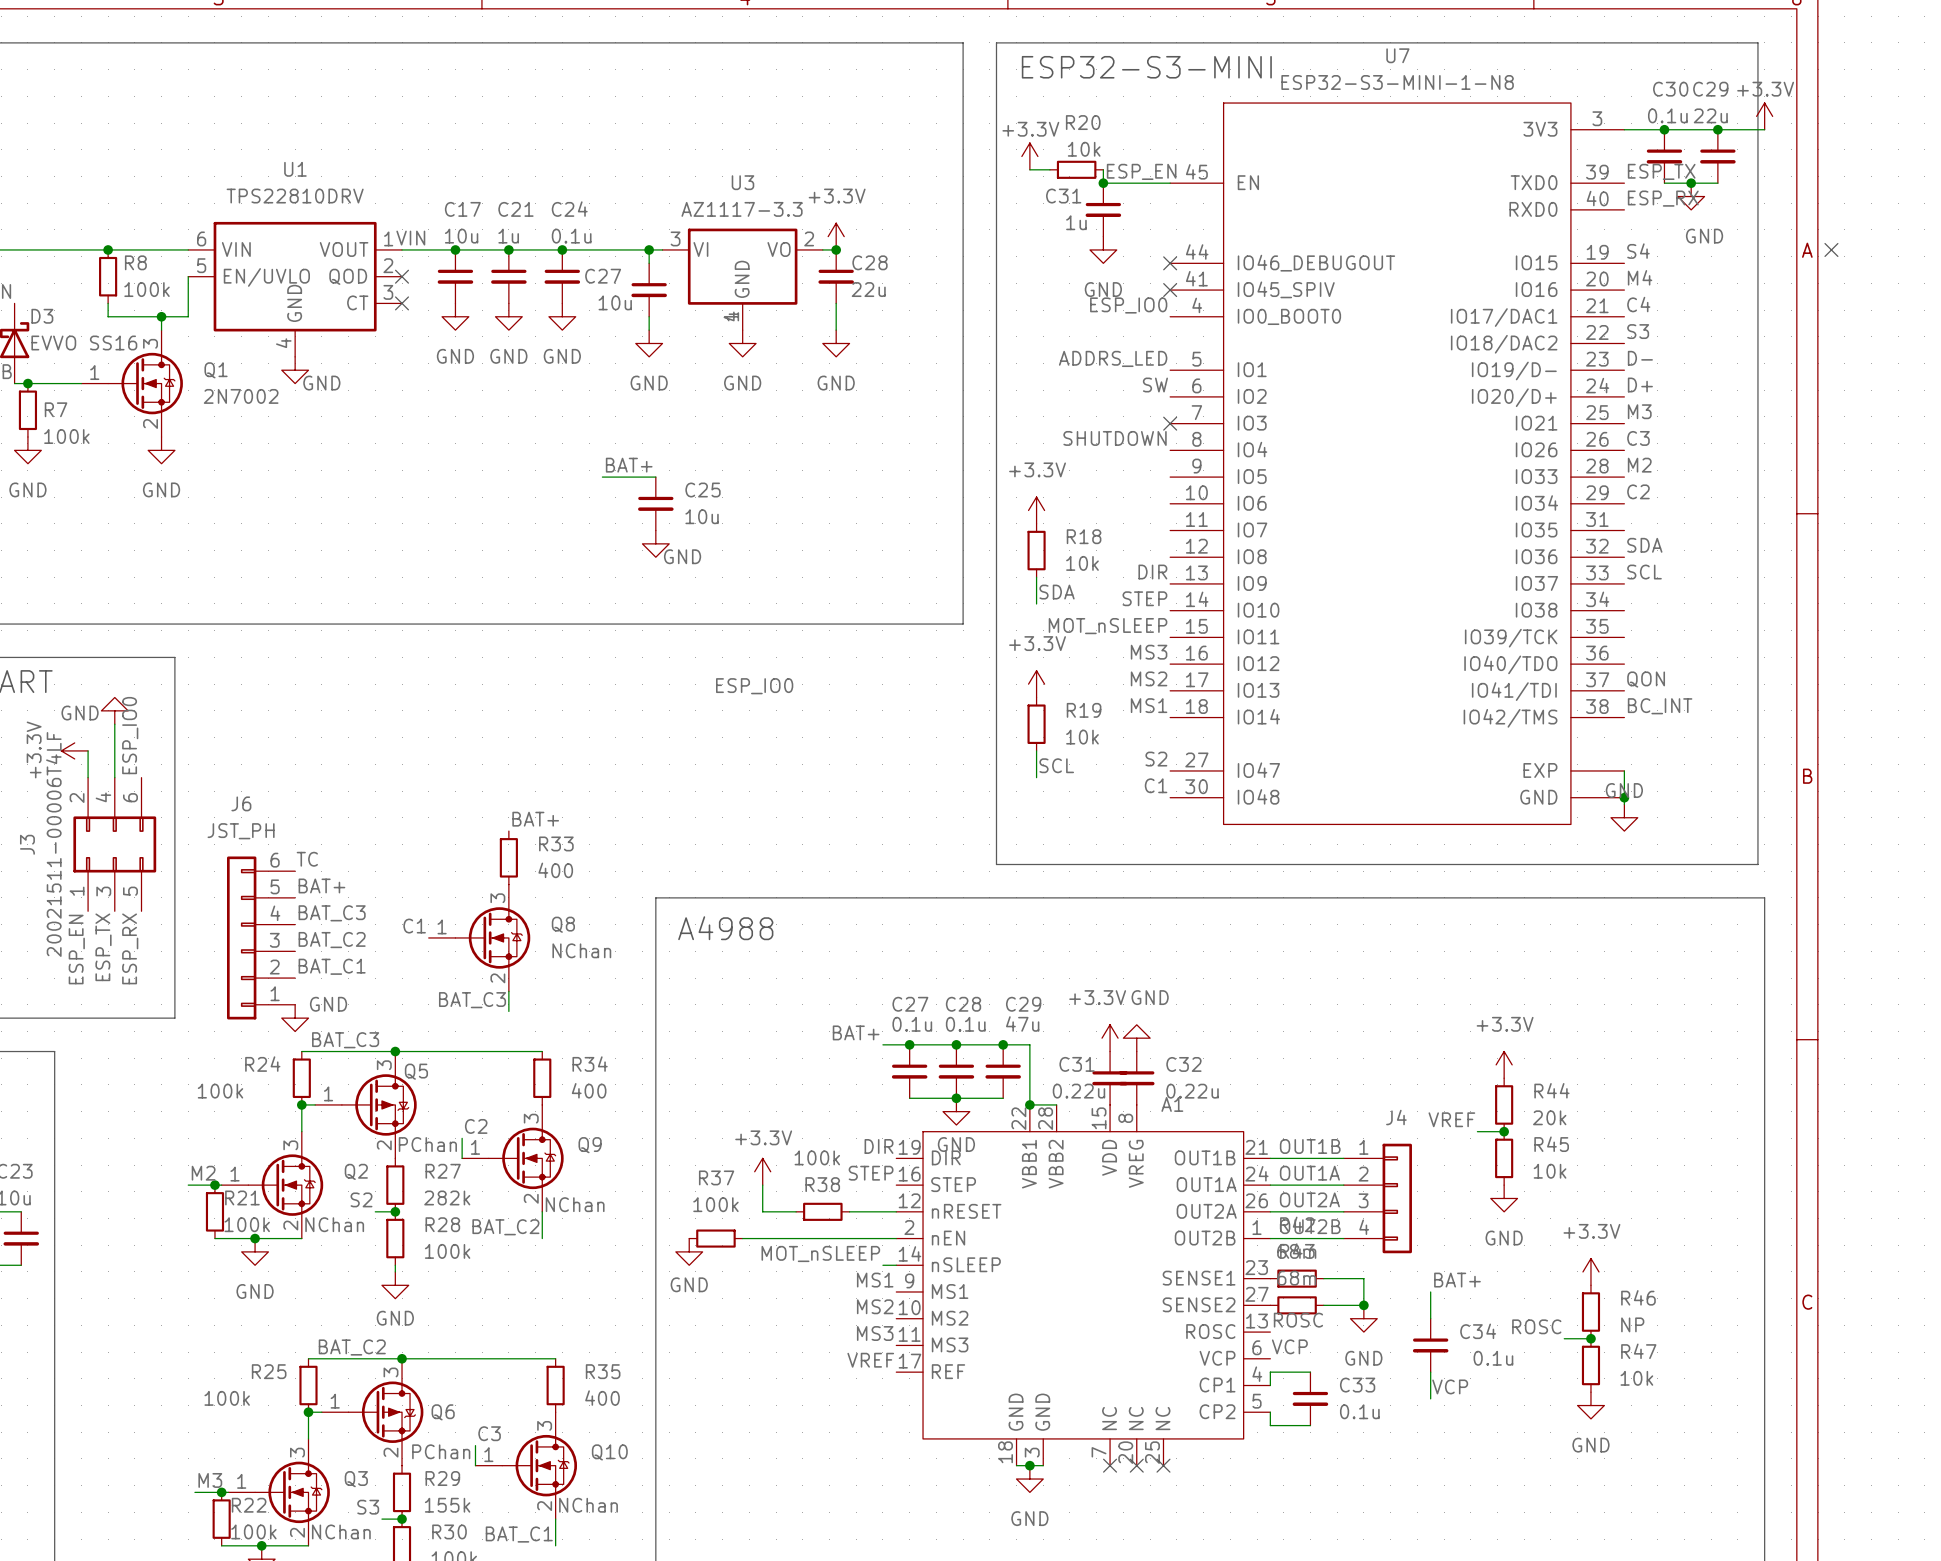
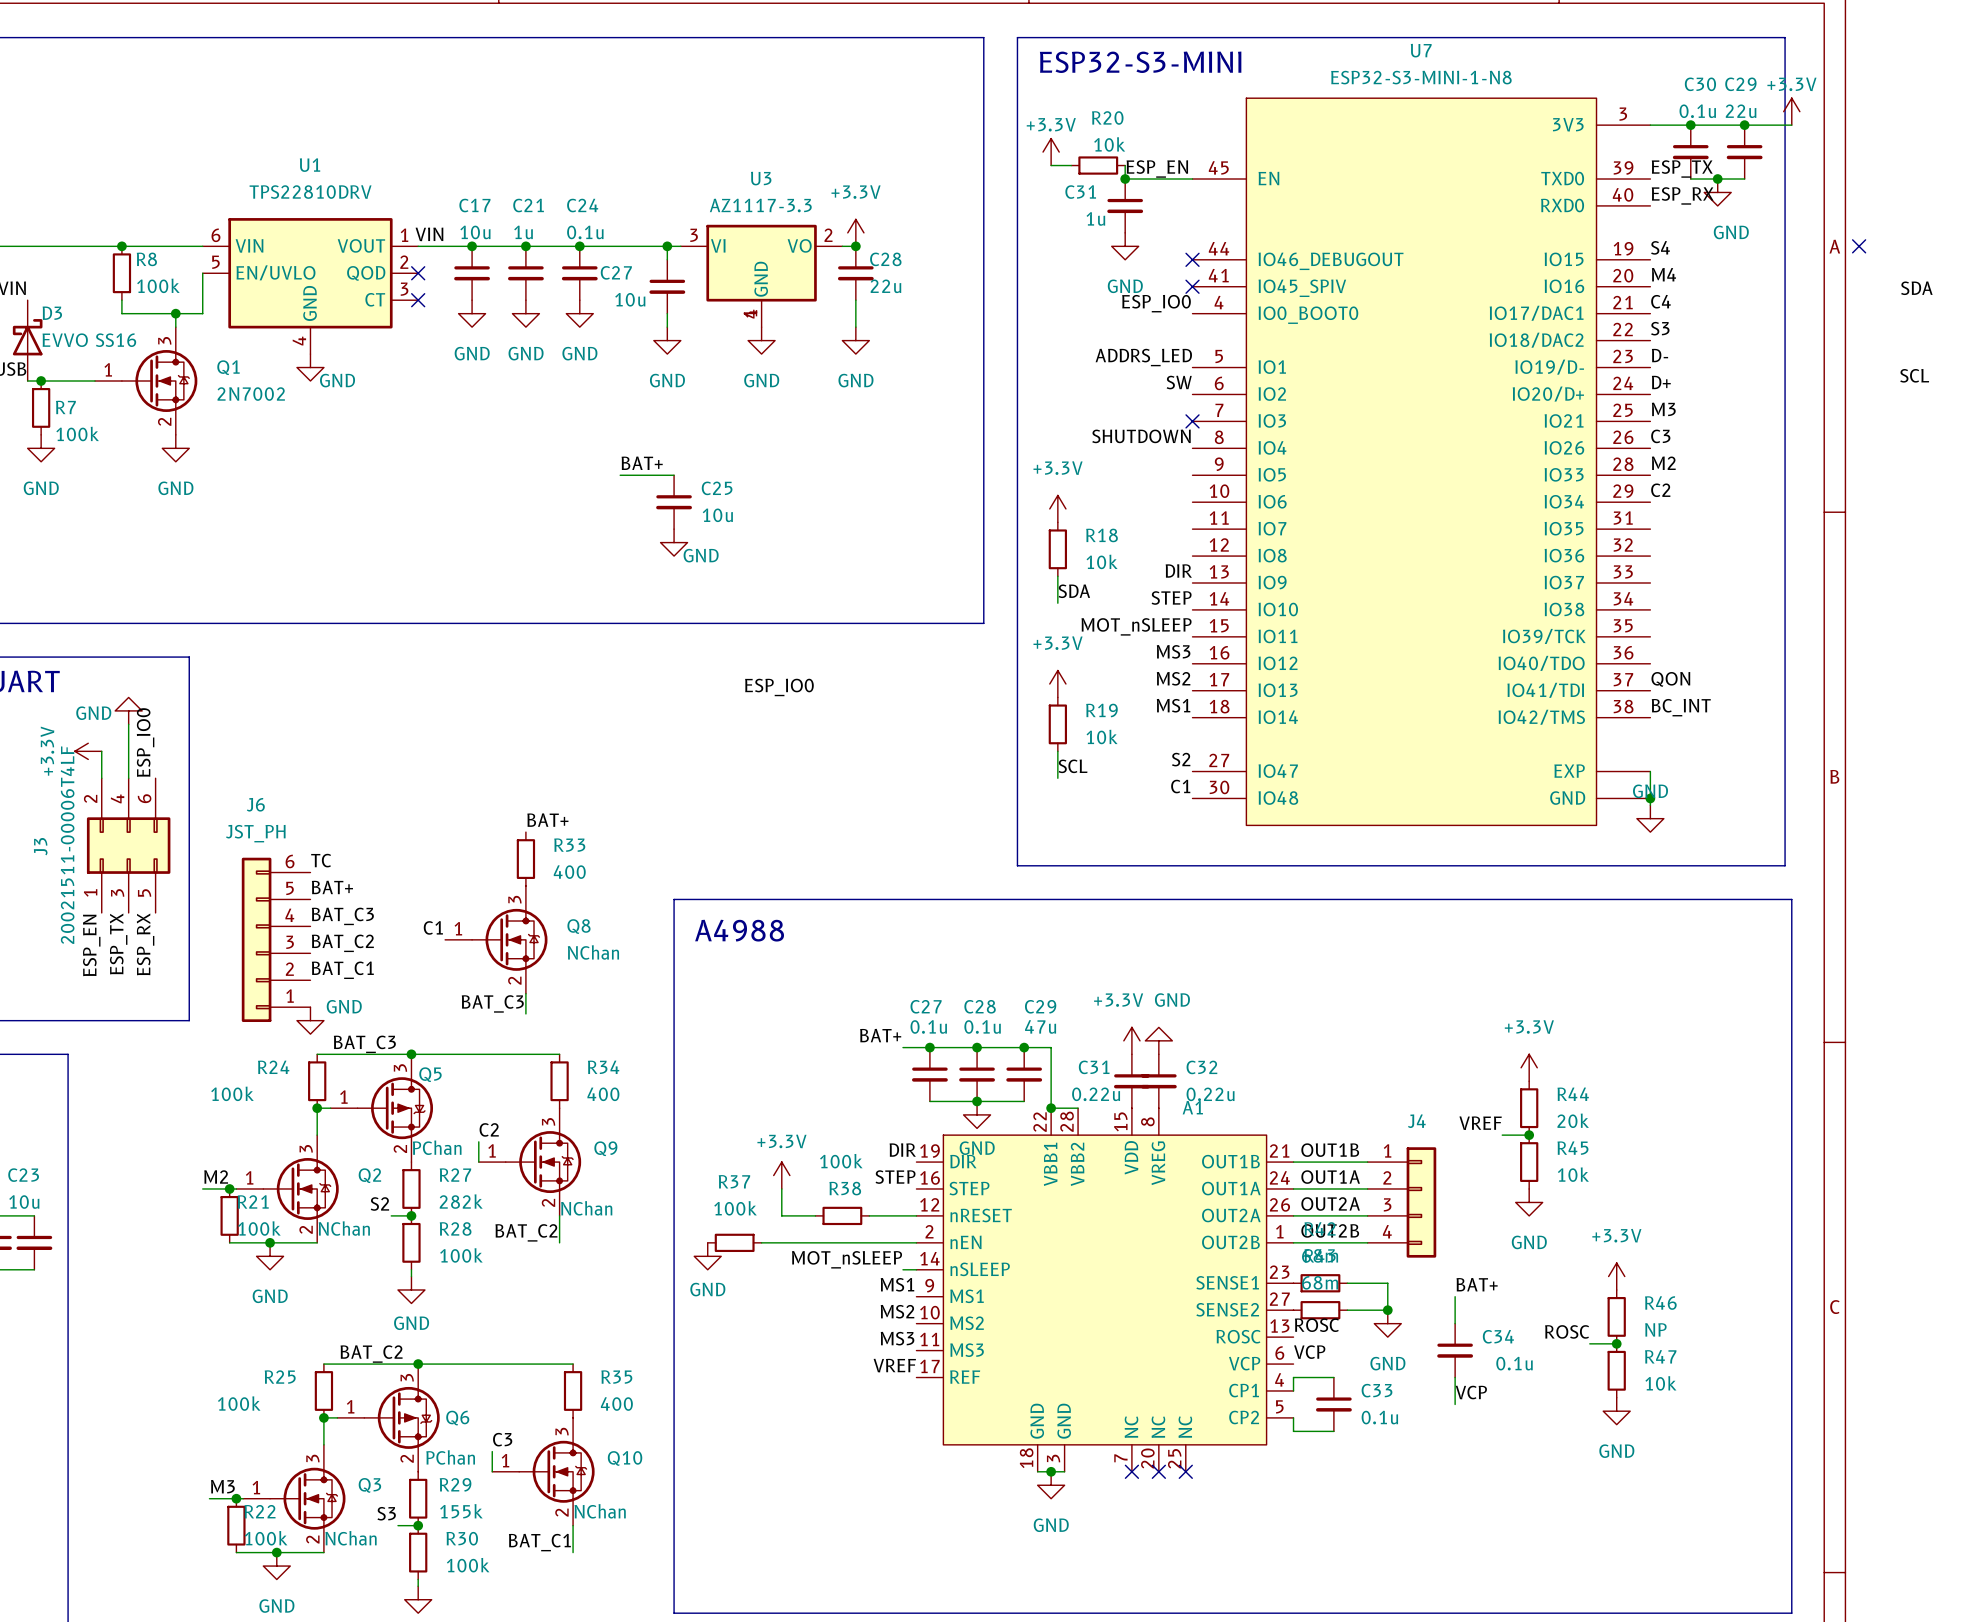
label: none -> SDA (1916, 288)
label: none -> SCL (1914, 375)
label: SDA (1644, 545) -> none
label: SCL (1644, 572) -> none

